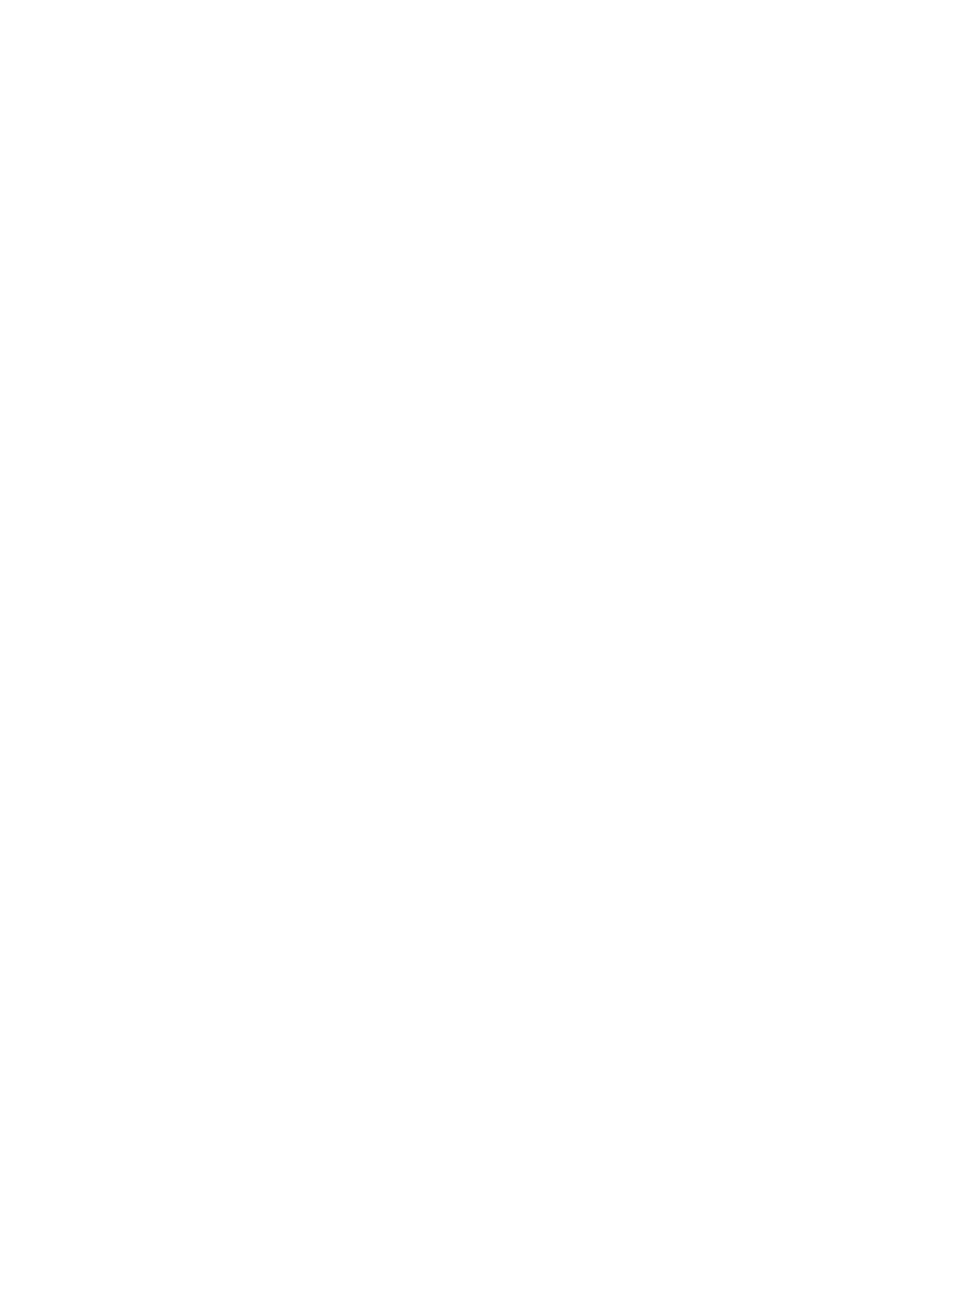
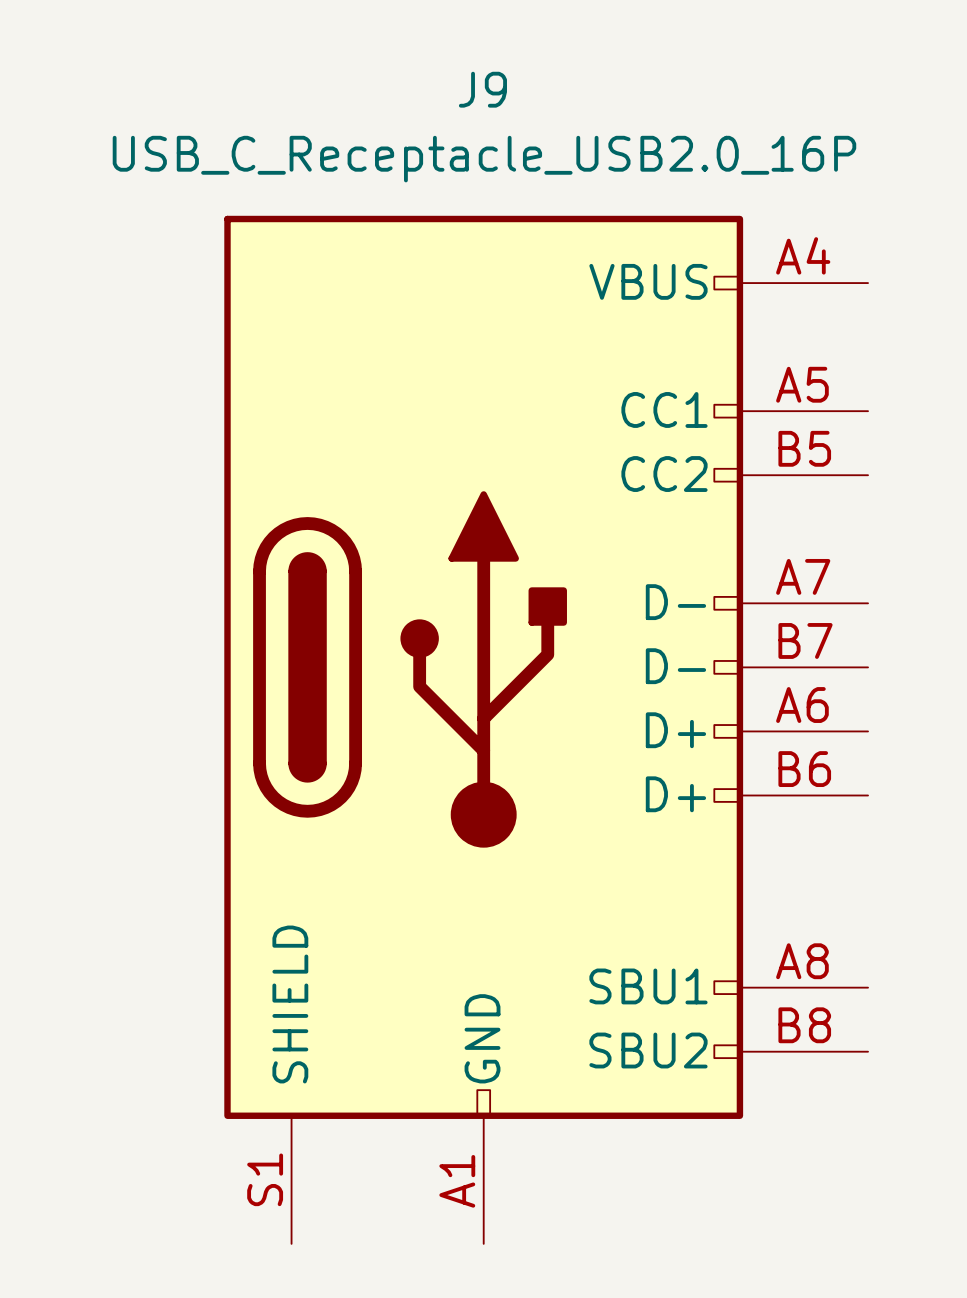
J9: none -> USB_C_Receptacle_USB2.0_16P (546, 729)

